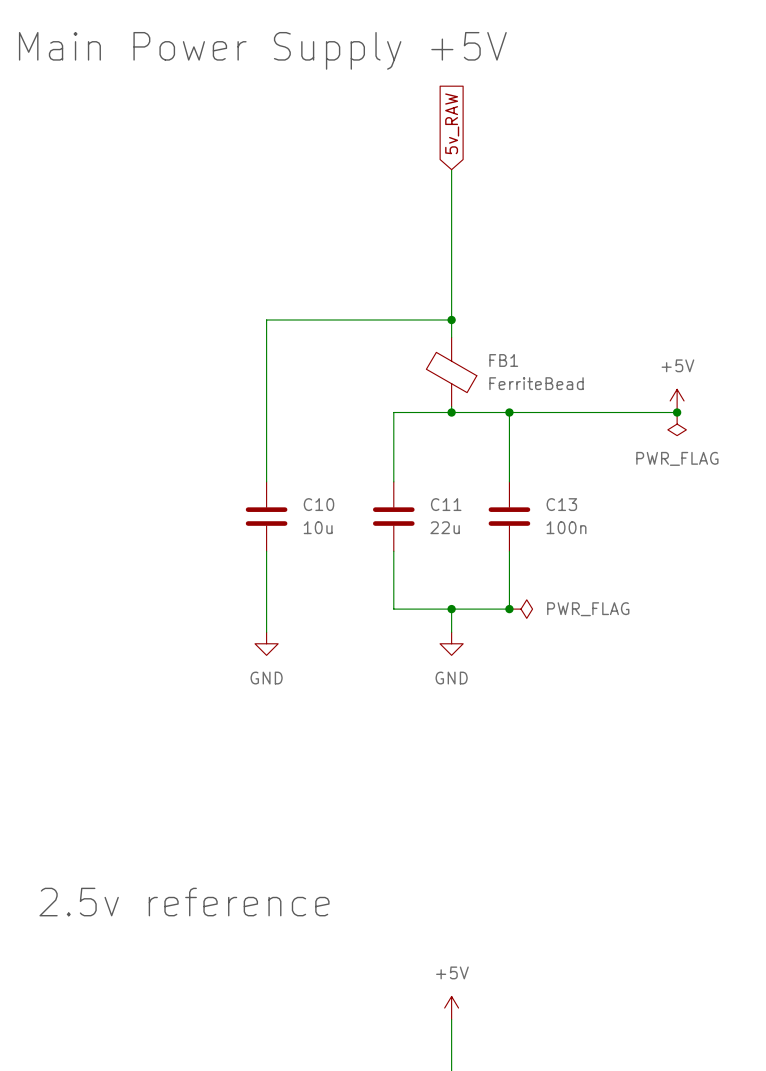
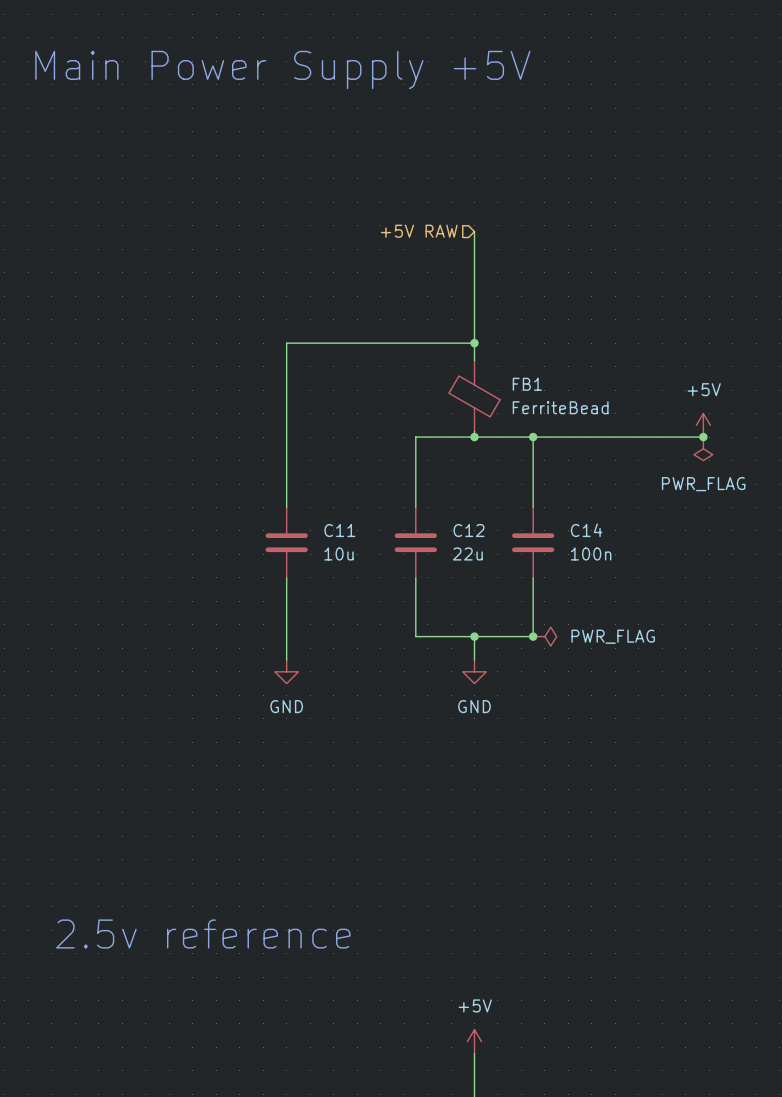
global label: 5v_RAW (452, 123) -> none
wire: (451, 169) (451, 210) -> none
hierarchical label: none -> +5V RAW (419, 231)
C10 name: C10 (318, 504) -> C11 (339, 530)
C11 name: C11 (446, 504) -> C12 (468, 530)
C13 name: C13 (561, 504) -> C14 (586, 530)

